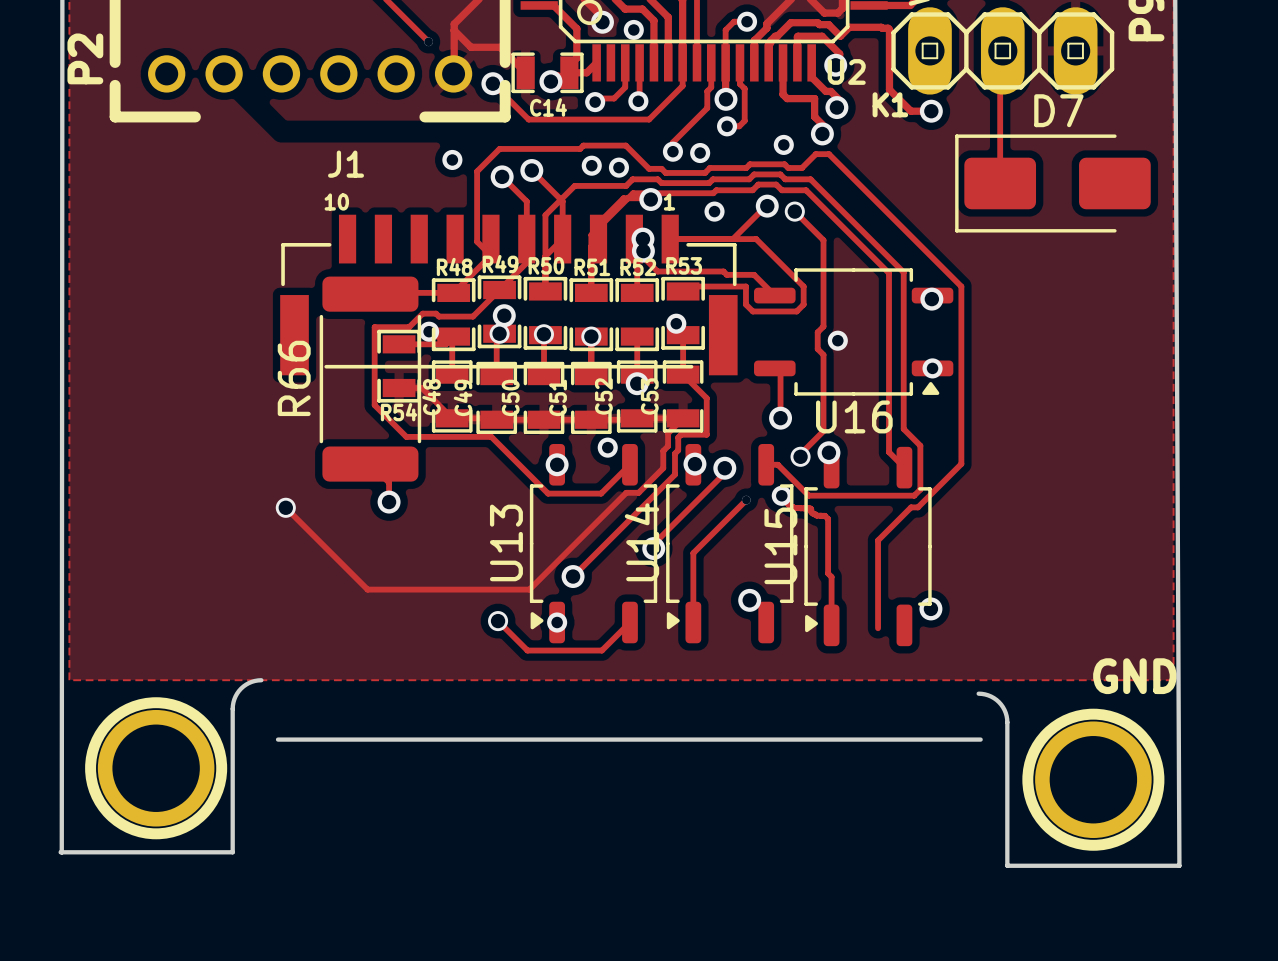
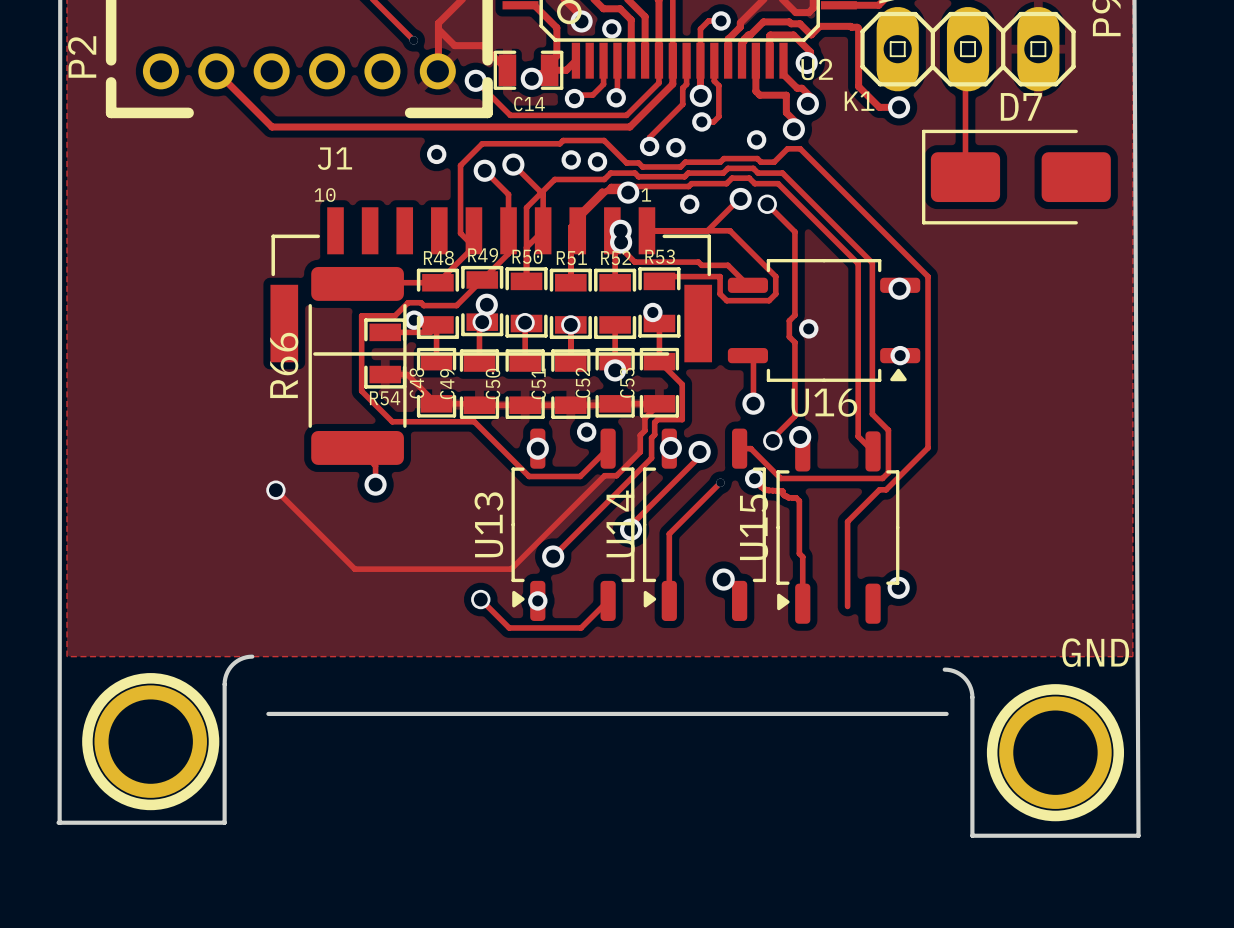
track: none -> (672, 60) (672, 84) (629, 127) (271, 127) (216, 71)

